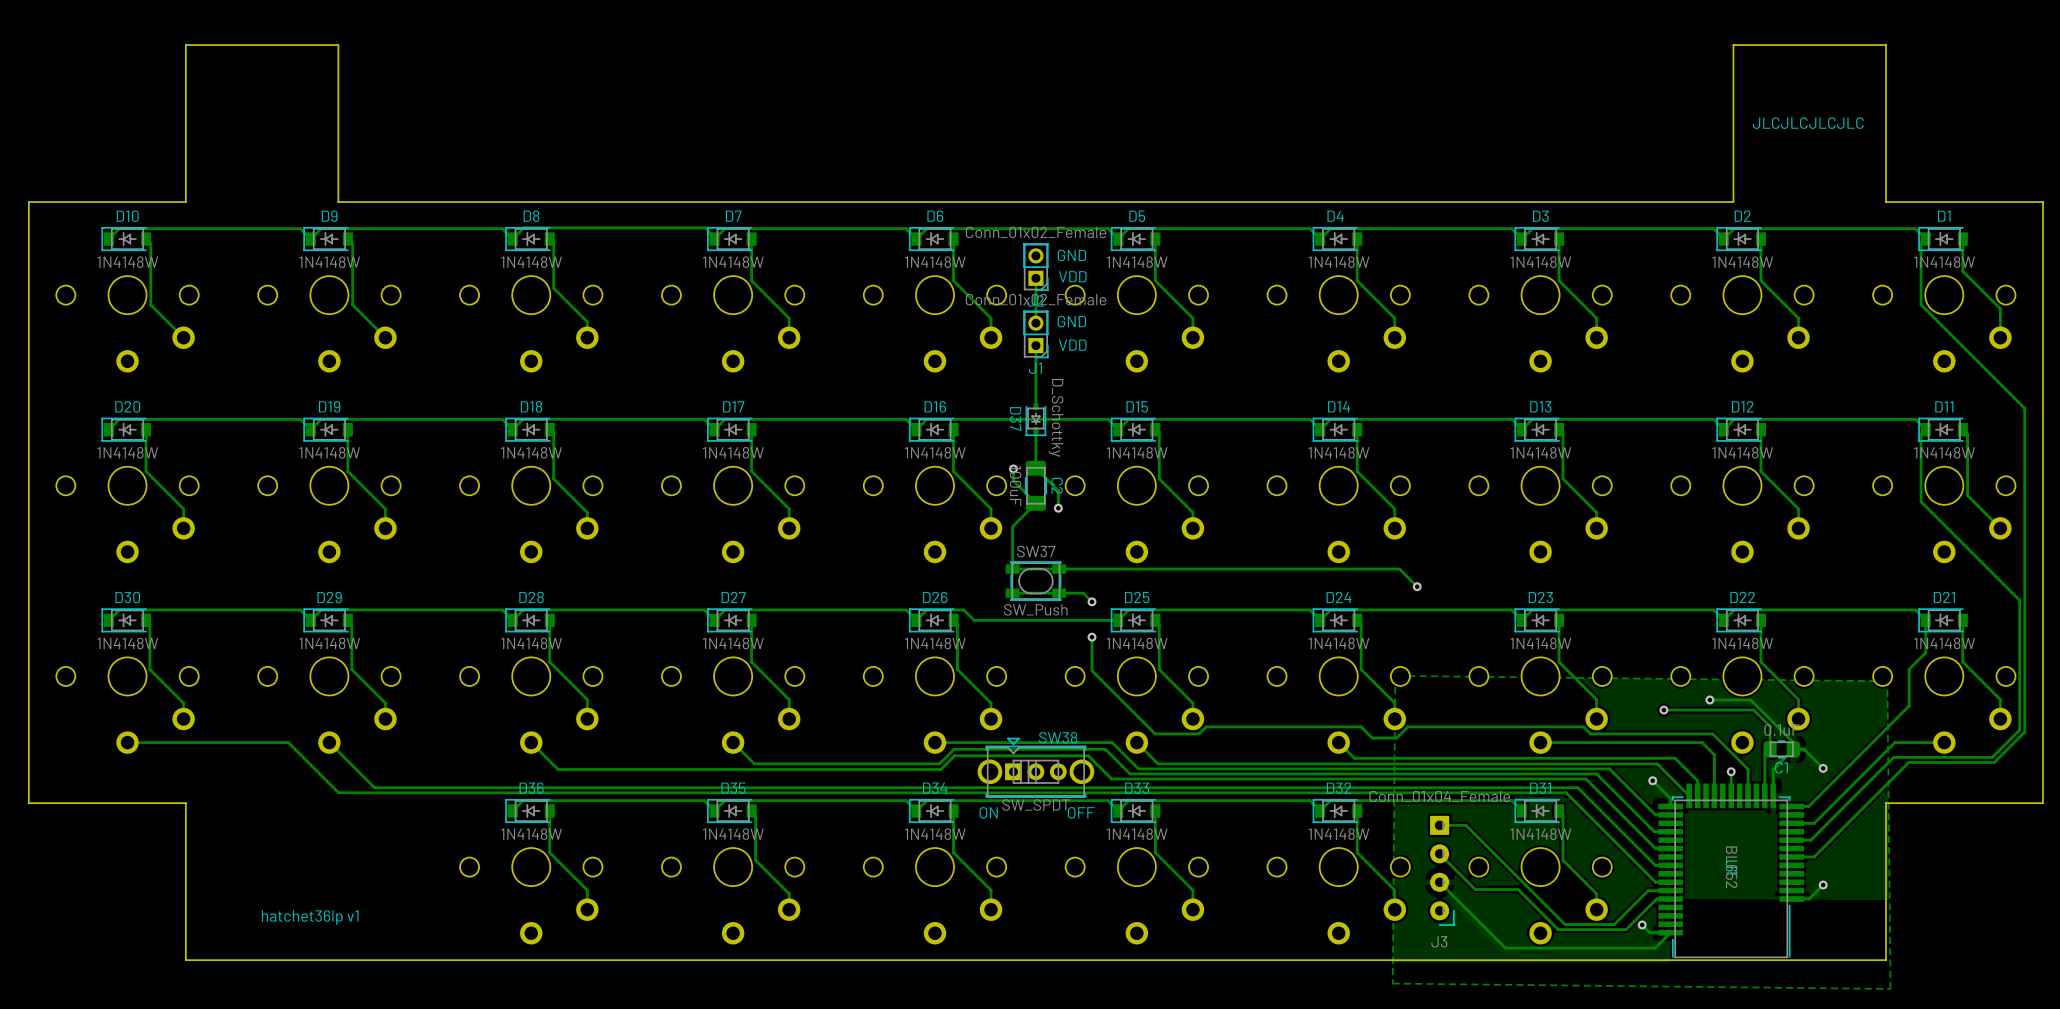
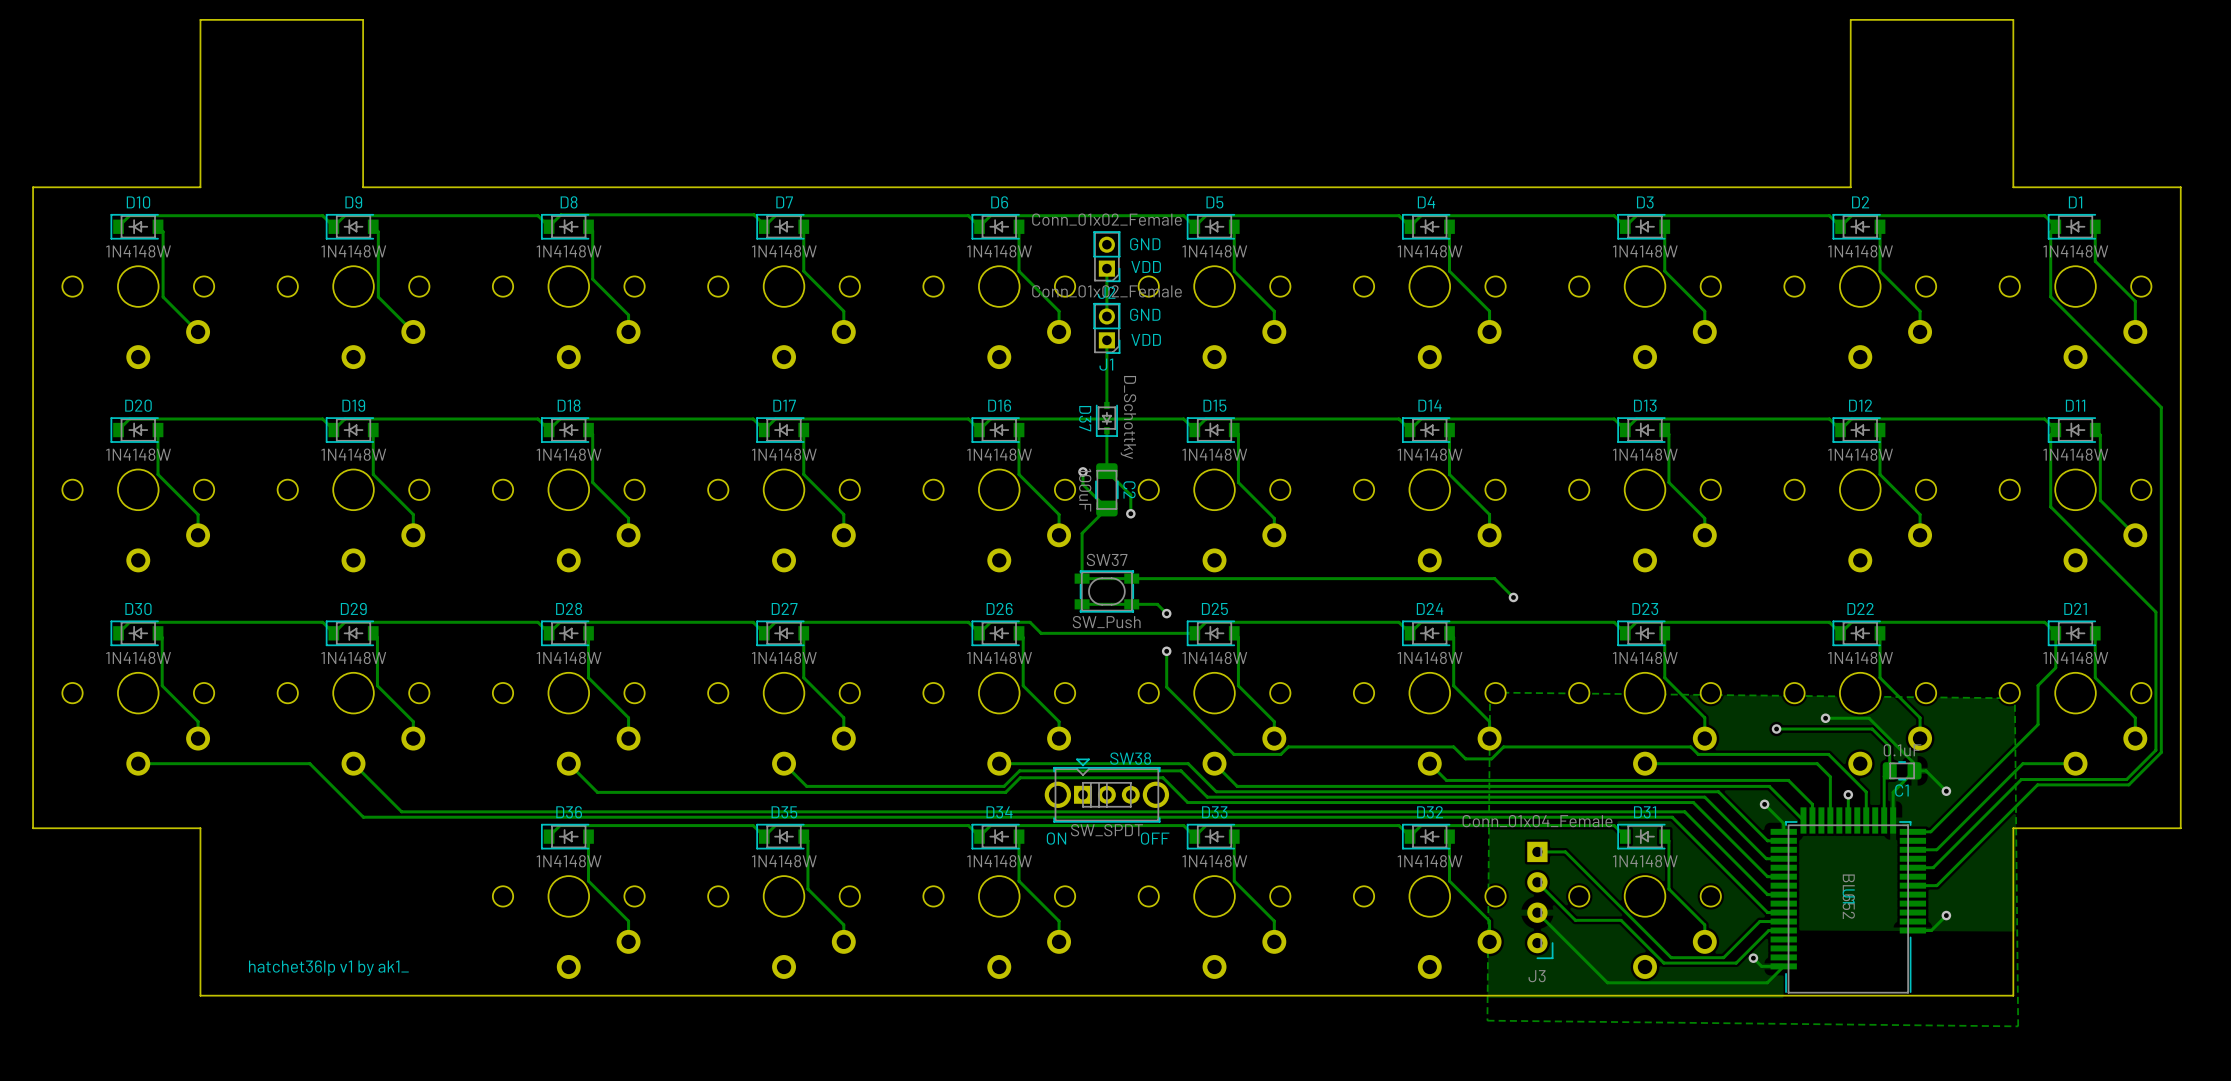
text: JLCJLCJLCJLC (1808, 123) -> none
text: hatchet36lp v1 (310, 917) -> hatchet36lp v1 by ak1_ (328, 968)

